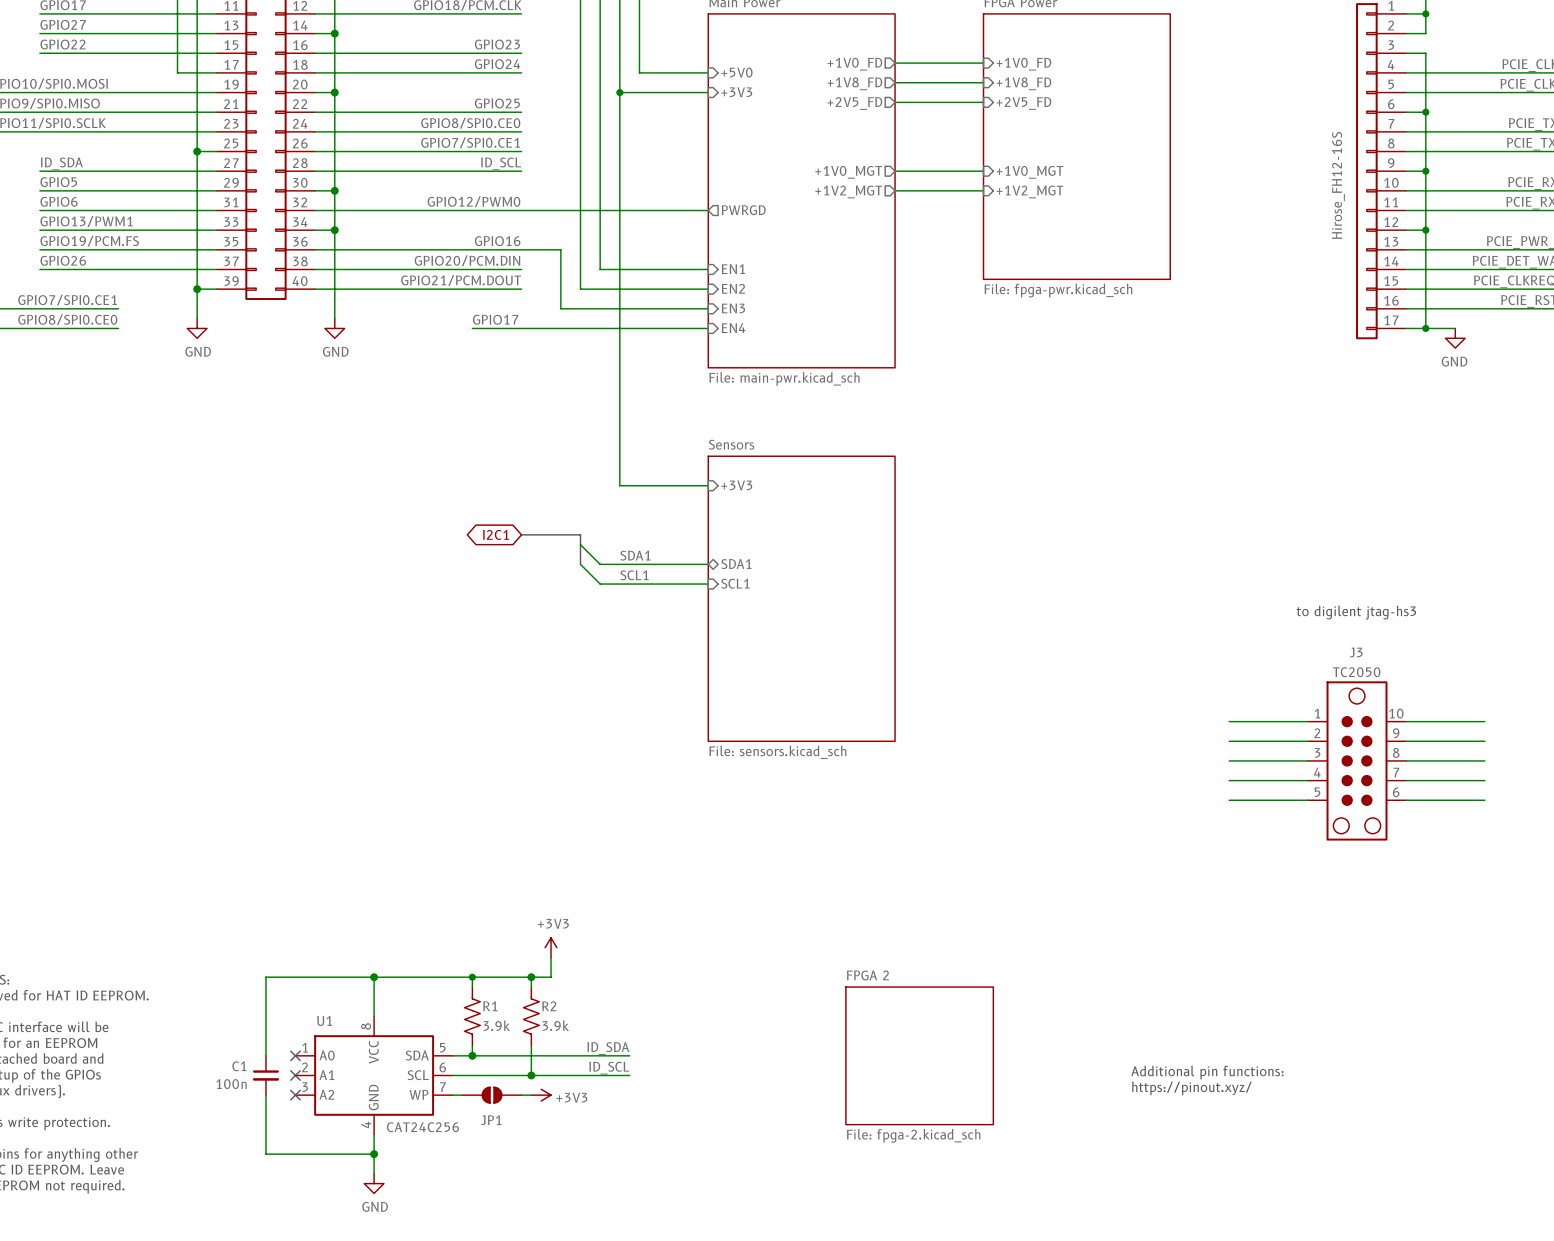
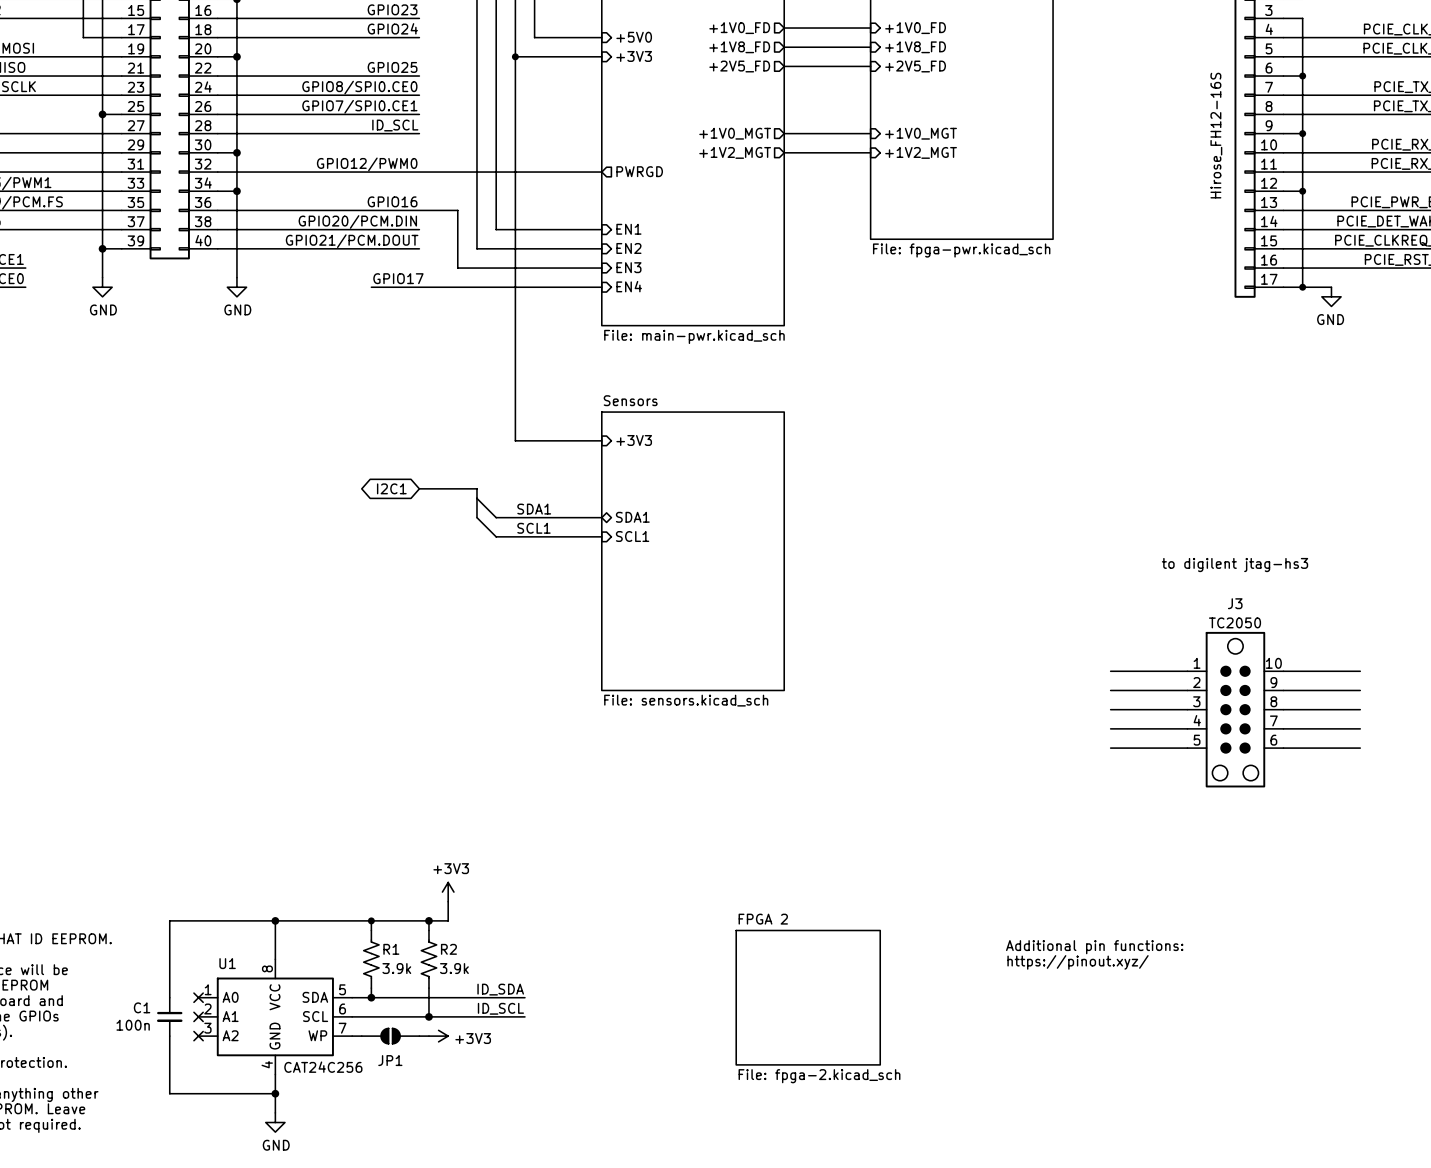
text position: Additional pin functions: (1207, 1072) -> Additional pin functions: (1094, 947)
text position: https://pinout.xyz/ (1191, 1088) -> https://pinout.xyz/ (1078, 962)

